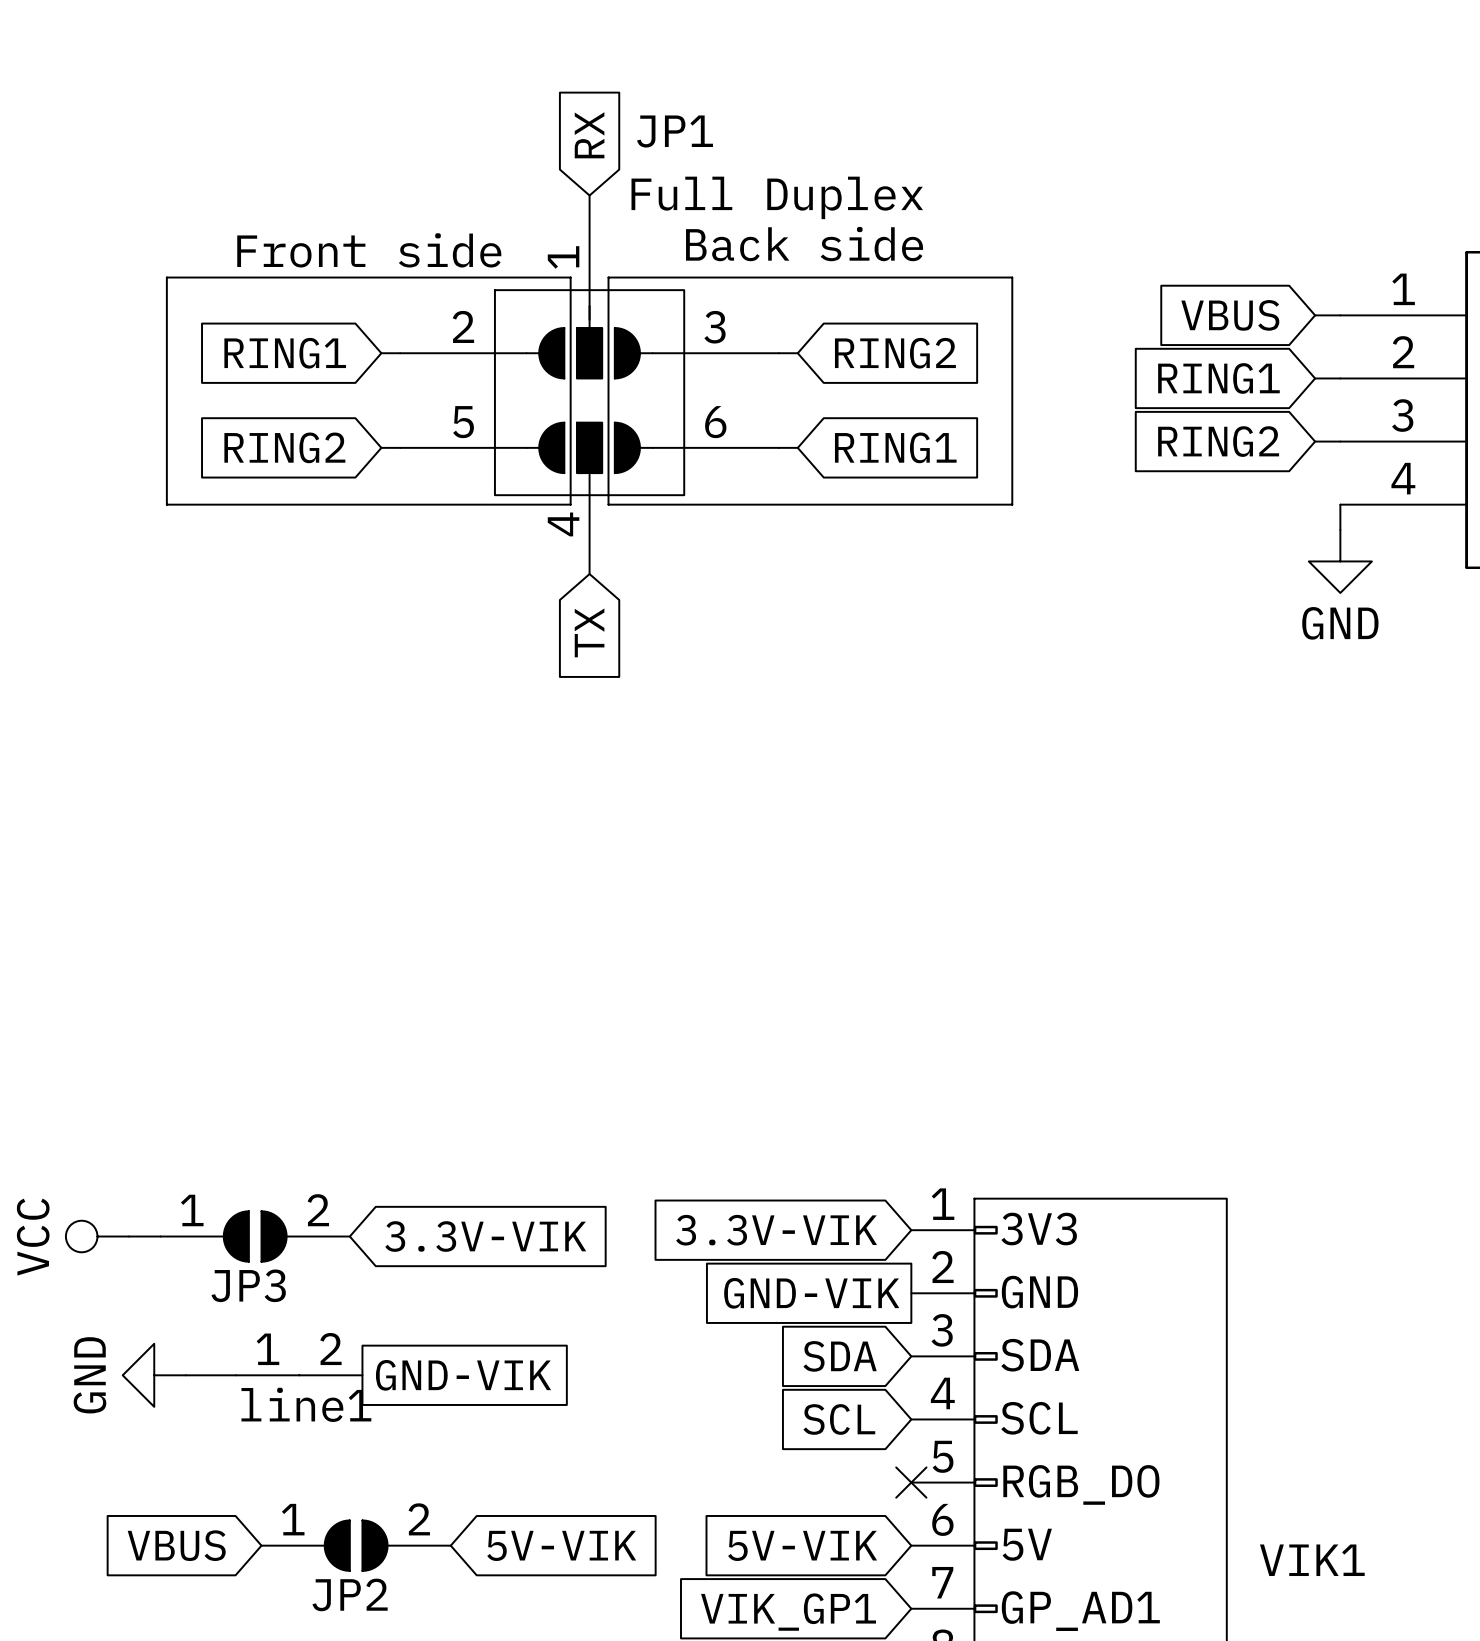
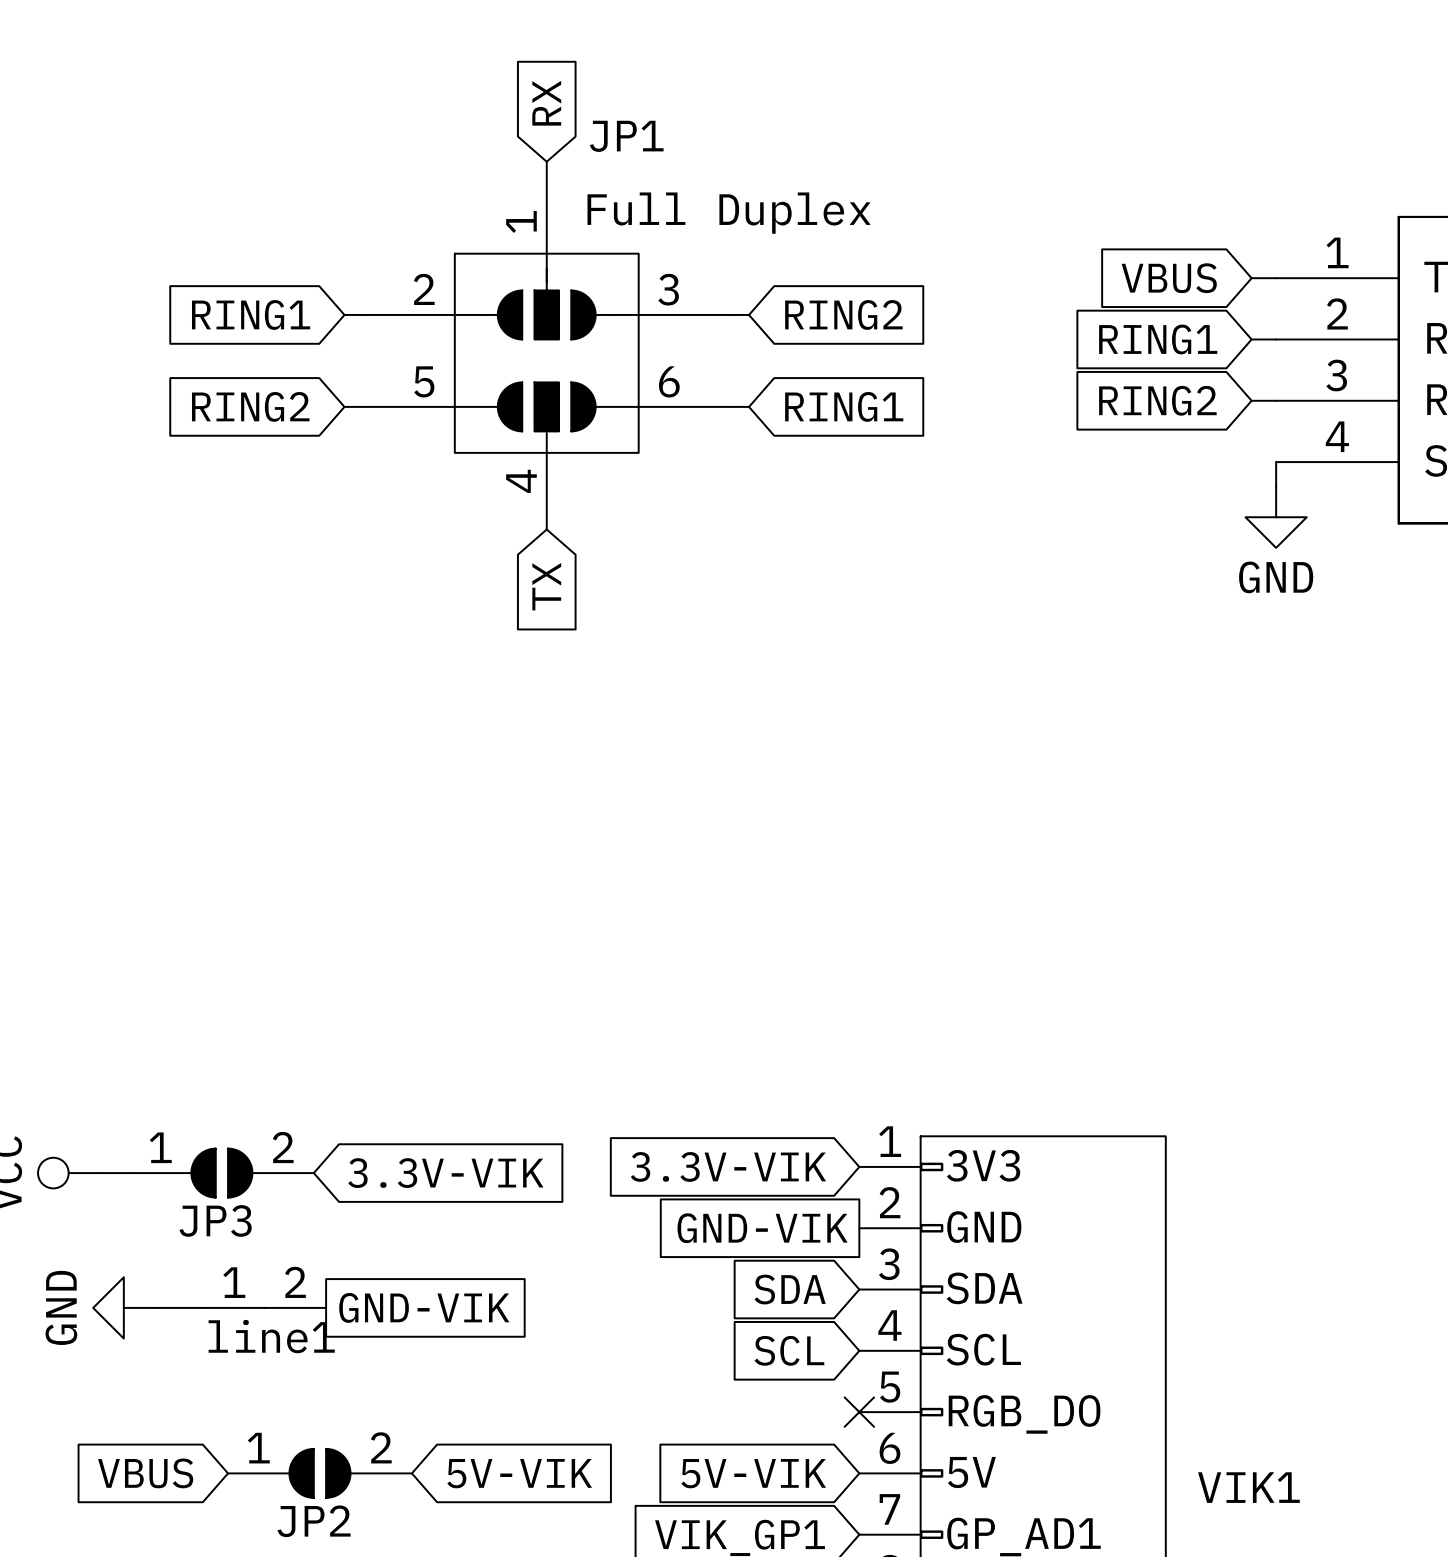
JP1 name position: JP1 (675, 131) -> JP1 (626, 136)
JP1 value position: Full Duplex (777, 197) -> Full Duplex (729, 213)
text: Back side (804, 244) -> none
text: Front side (369, 250) -> none
line: (166, 277) (570, 277) (570, 504) (166, 504) (166, 277) -> none
line: (608, 277) (1012, 277) (1012, 504) (608, 504) (608, 277) -> none

